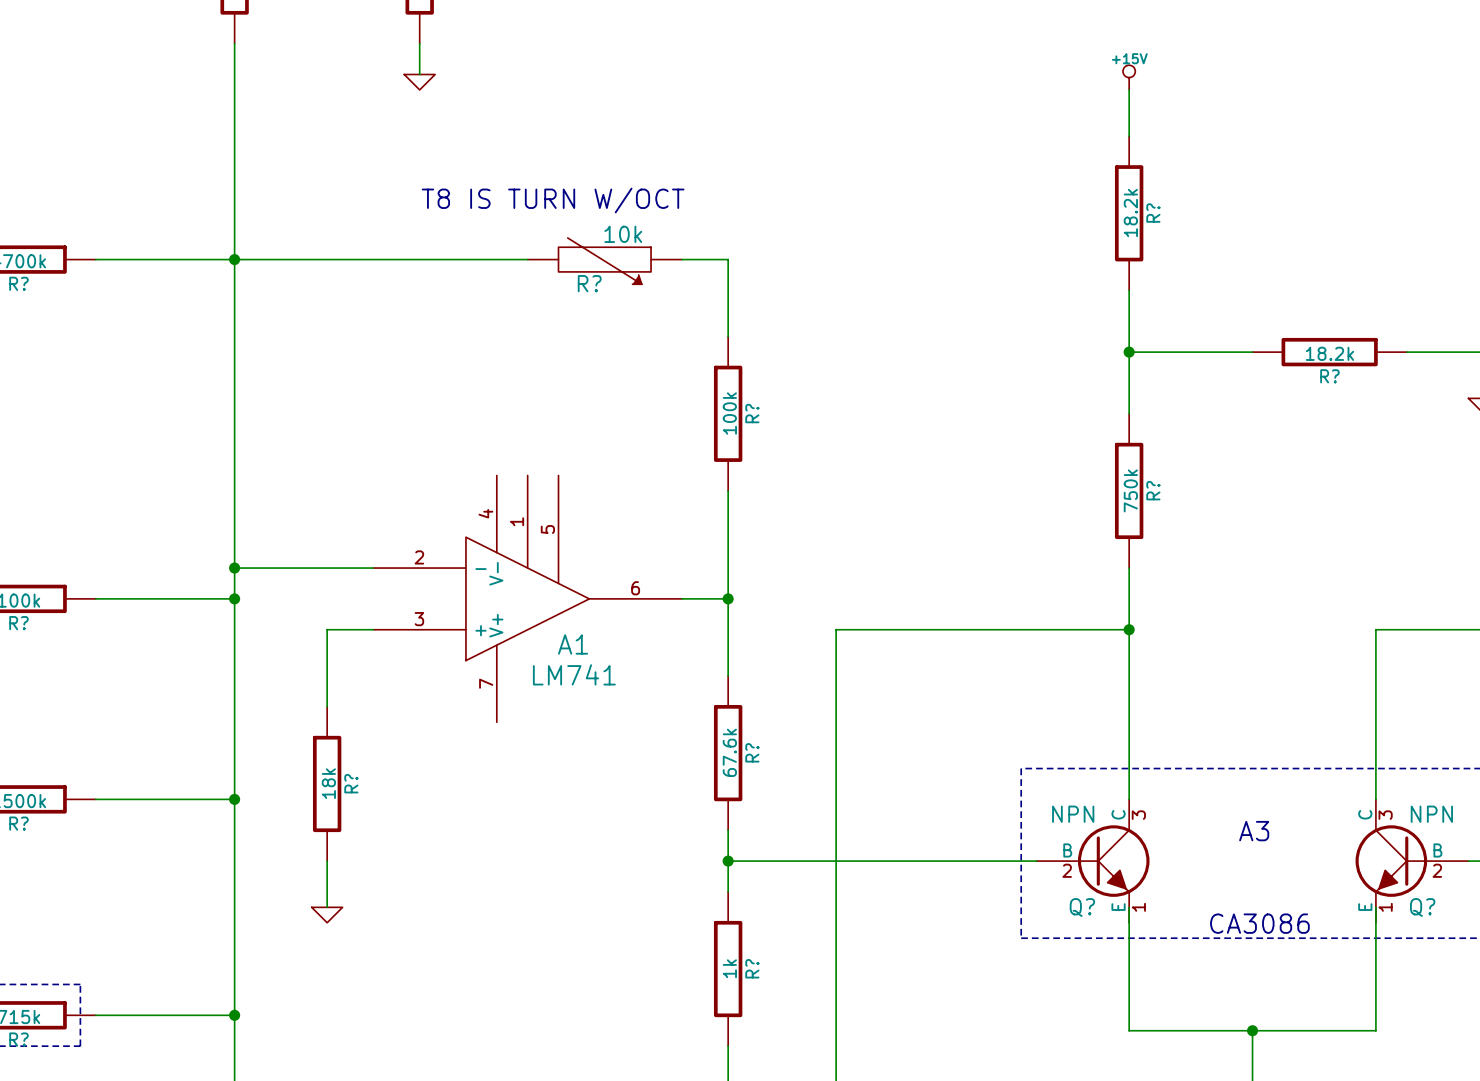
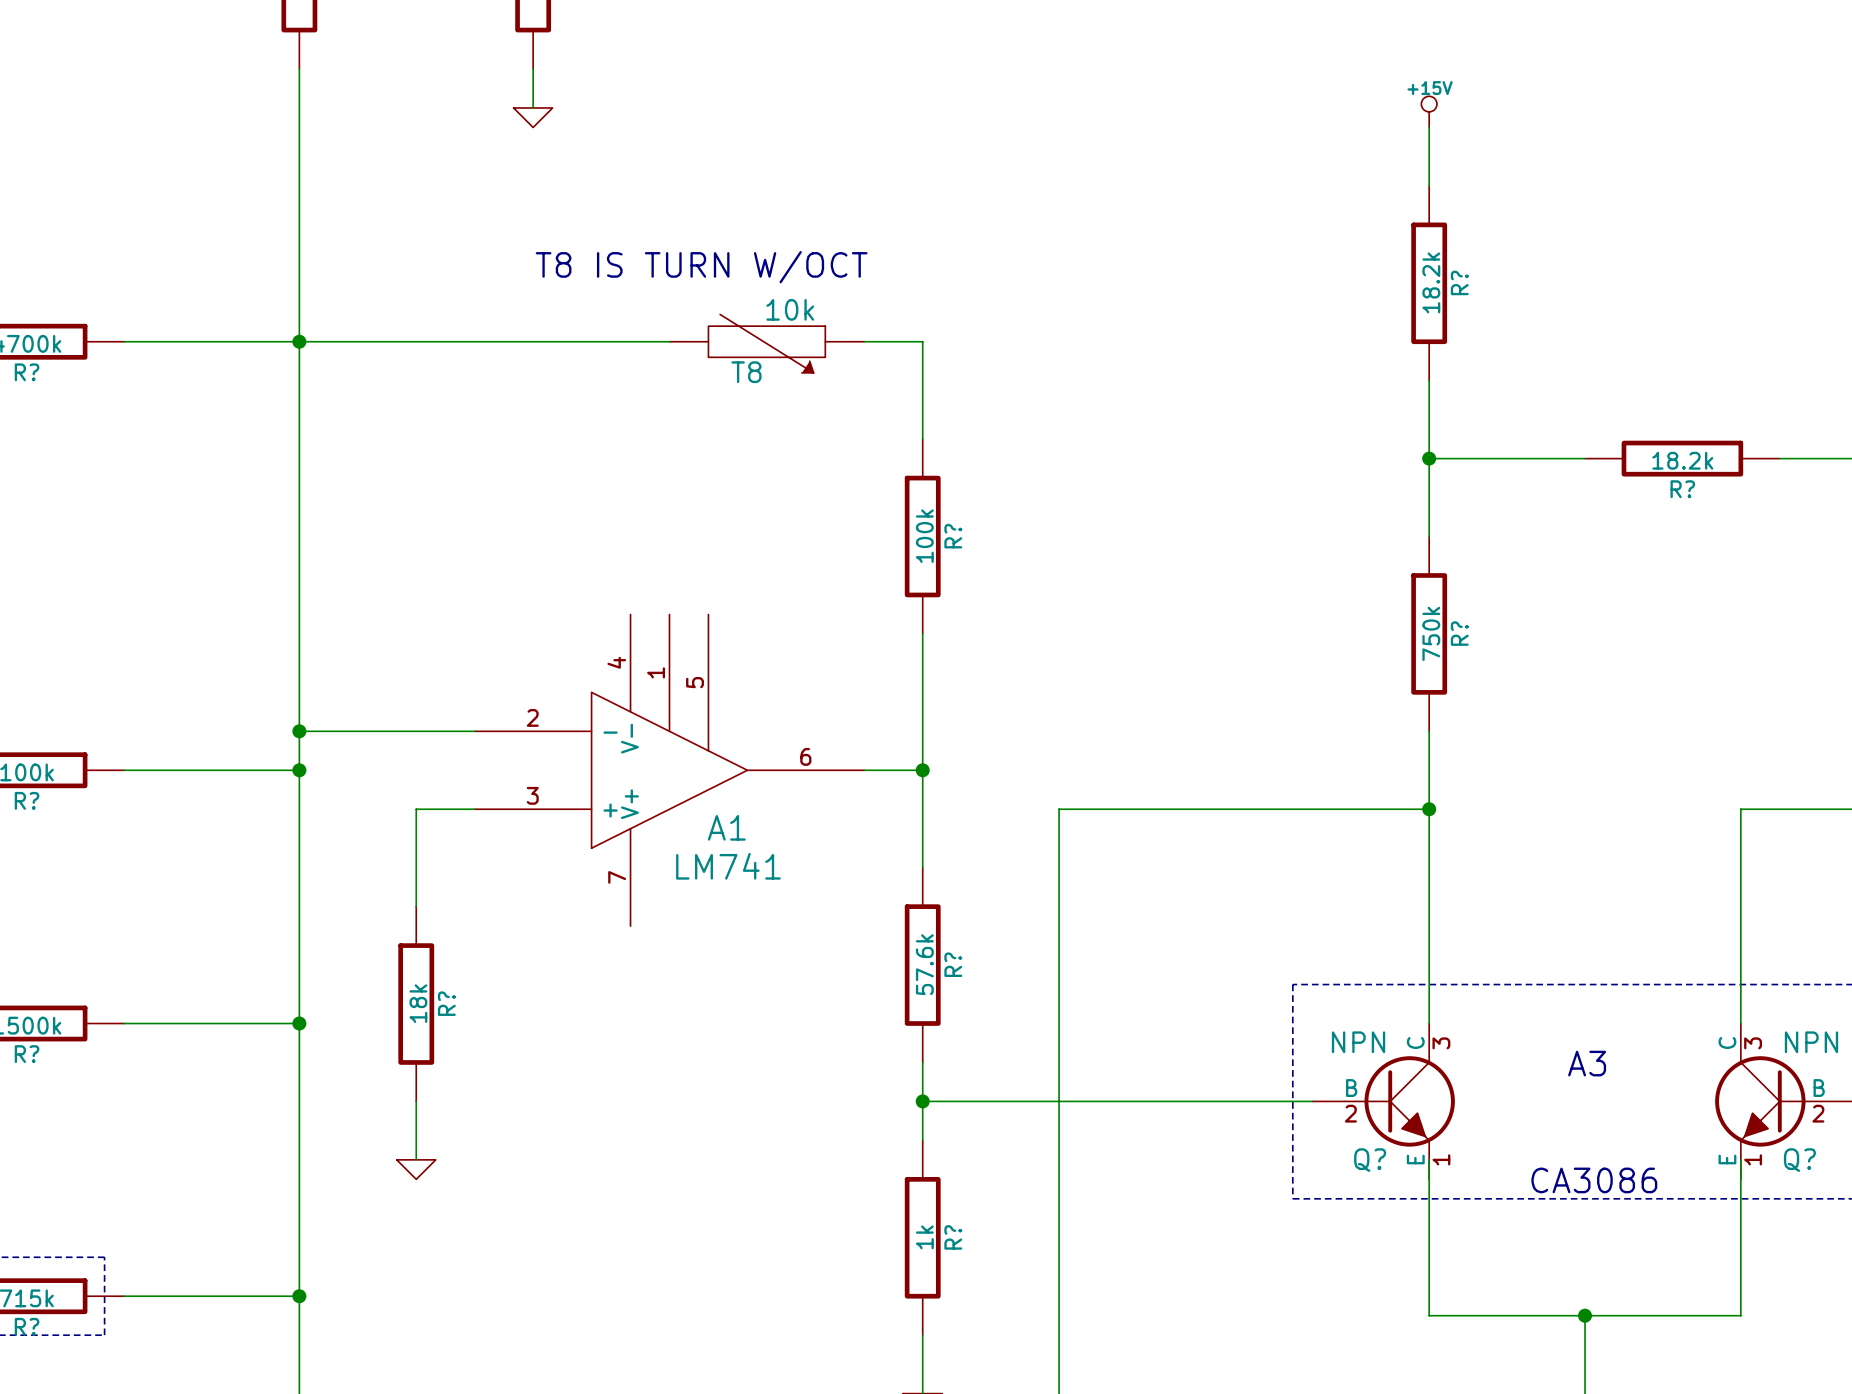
R? name: R? (589, 283) -> T8 (746, 372)
R? value: 67.6k (729, 752) -> 57.6k (924, 964)

